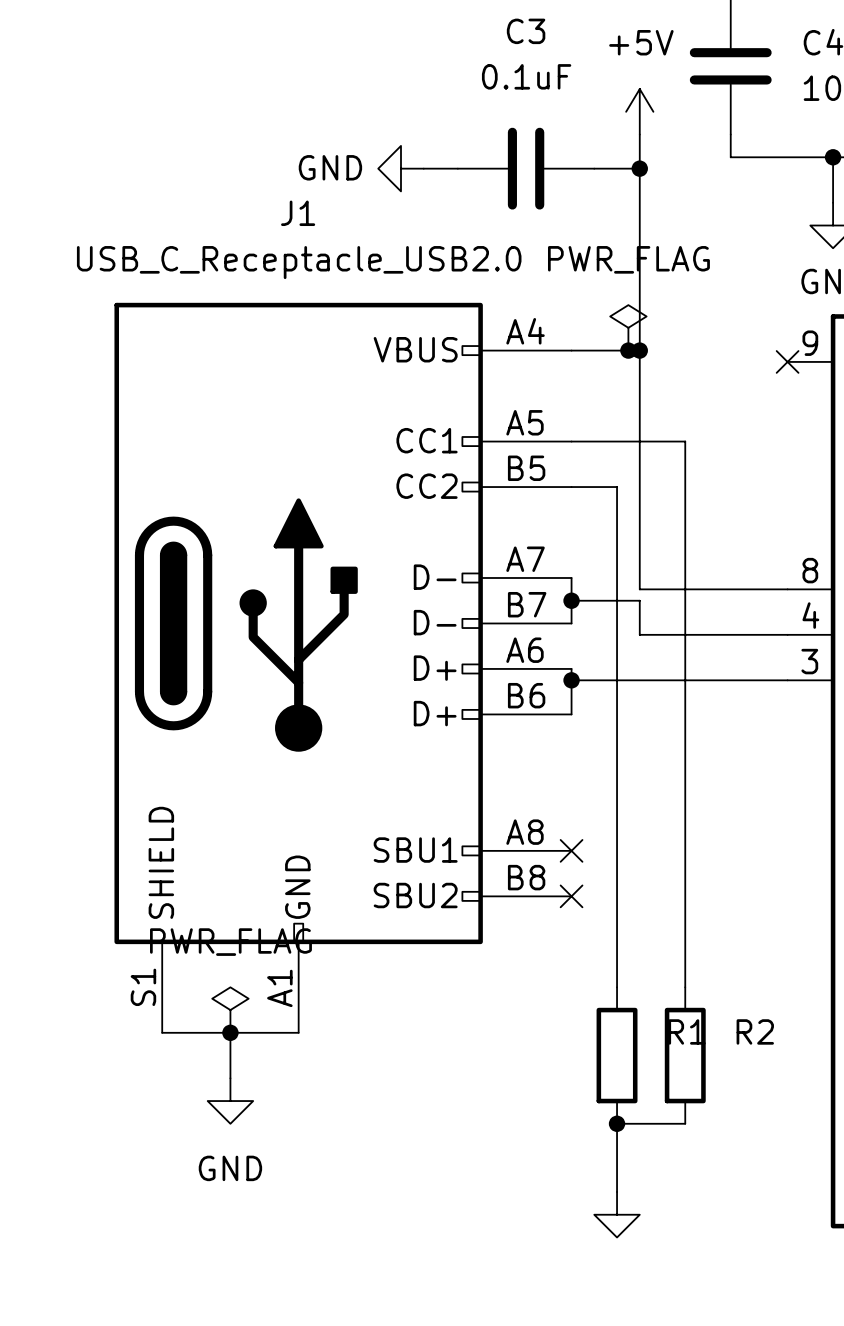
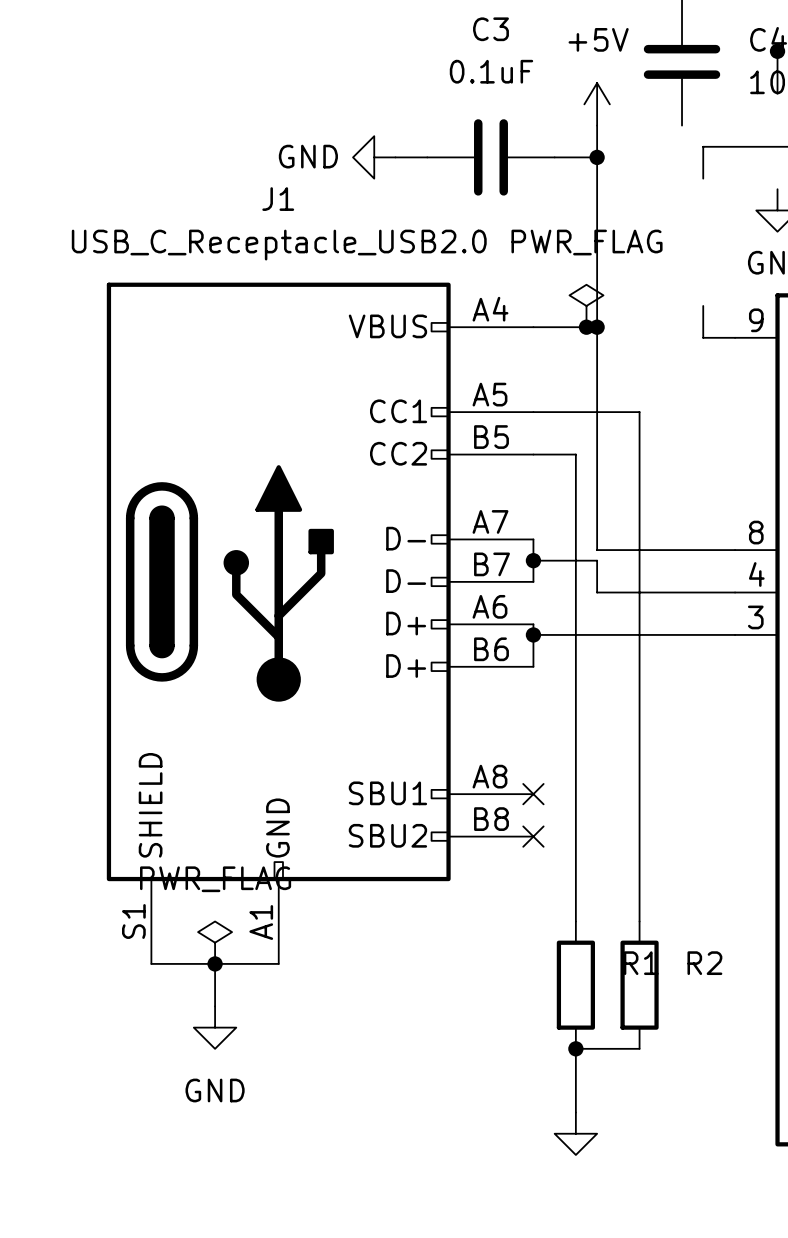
junction: none -> (777, 51)
wire: (730, 134) (730, 157) (753, 157) -> (703, 178) (703, 146)
wire: (833, 157) (833, 202) -> (777, 51) (777, 93)
junction: (833, 157) -> none
wire: none -> (703, 305) (703, 337) (735, 337)
no-connect mark: (787, 361) -> none

